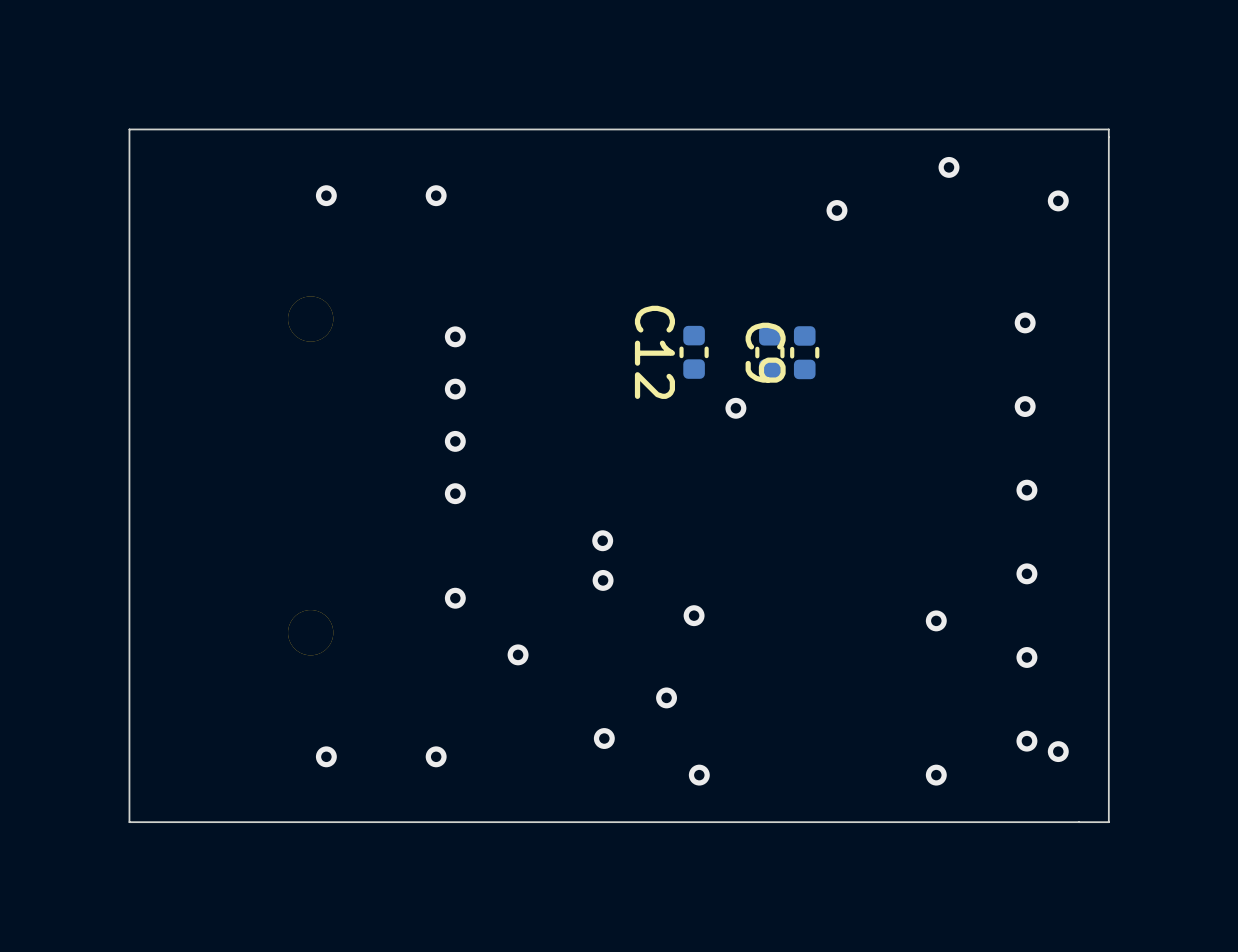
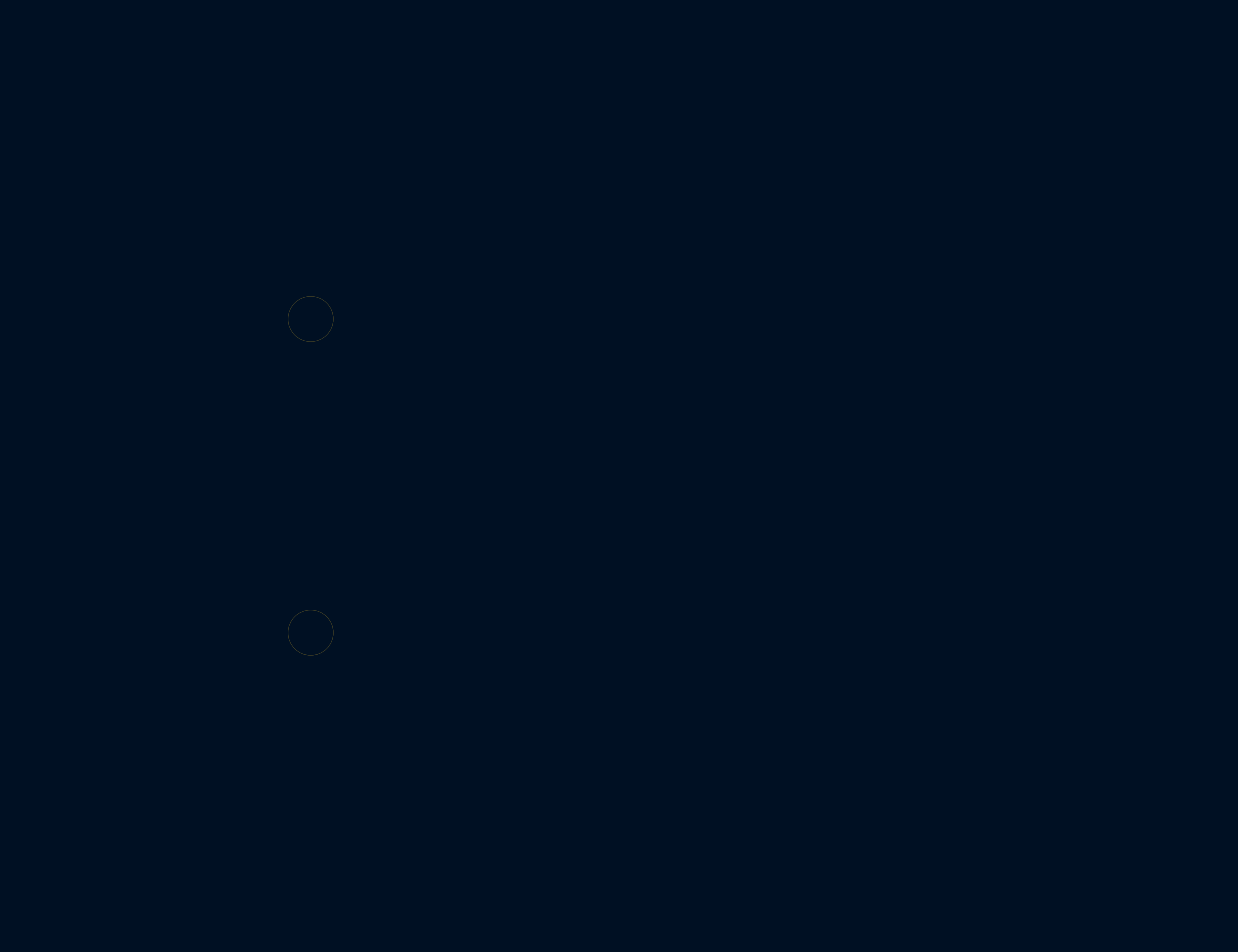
board edge: (1108, 129) (129, 129) (129, 822) (1108, 822) (1108, 129) -> none
via: (948, 167) -> none
via: (326, 195) -> none
via: (436, 195) -> none
via: (1058, 200) -> none
via: (836, 210) -> none
via: (1025, 322) -> none
via: (455, 336) -> none
C12: (694, 352) -> none
part: (769, 352) -> none
C9: (804, 352) -> none
via: (455, 389) -> none
via: (1025, 406) -> none
via: (735, 408) -> none
via: (455, 441) -> none
via: (1026, 490) -> none
via: (455, 493) -> none
via: (602, 540) -> none
via: (1026, 573) -> none
via: (603, 580) -> none
via: (455, 598) -> none
via: (694, 615) -> none
via: (936, 620) -> none
via: (518, 654) -> none
via: (1026, 657) -> none
via: (666, 697) -> none
via: (604, 738) -> none
via: (1026, 741) -> none
via: (1058, 751) -> none
via: (326, 756) -> none
via: (436, 756) -> none
via: (699, 775) -> none
via: (936, 775) -> none

